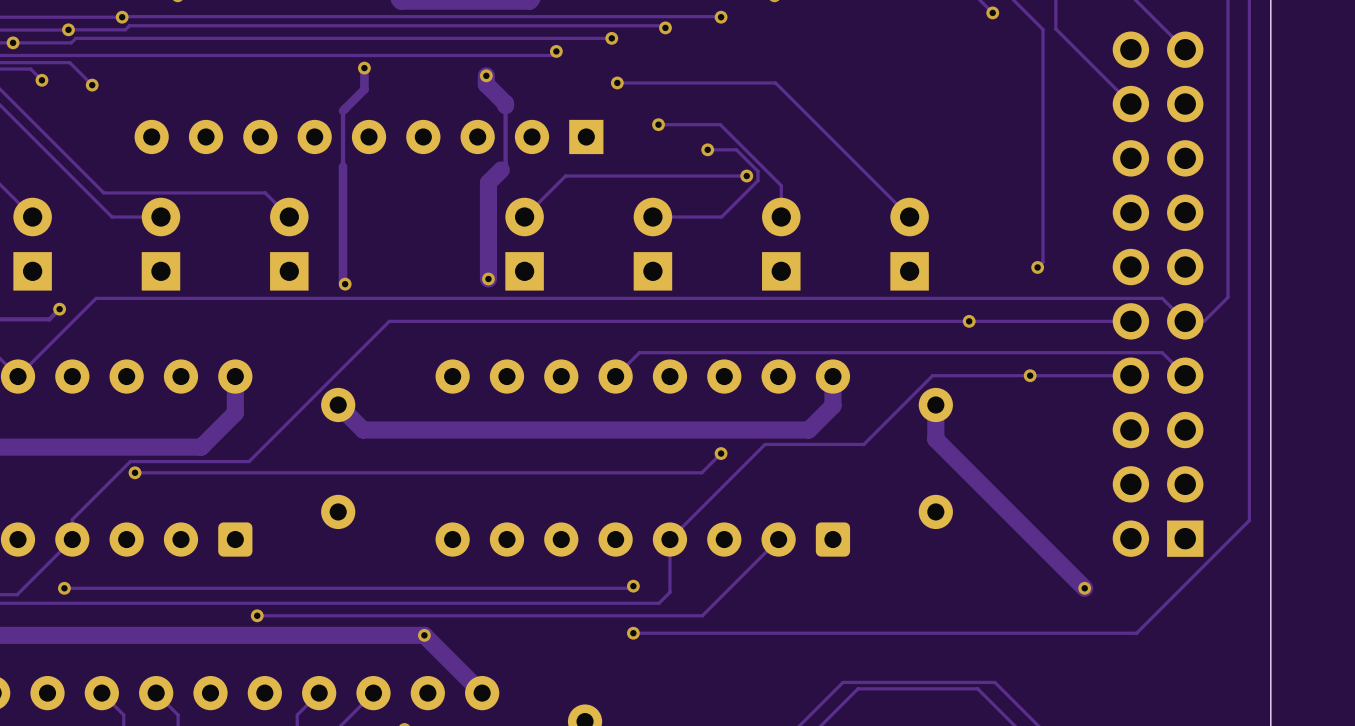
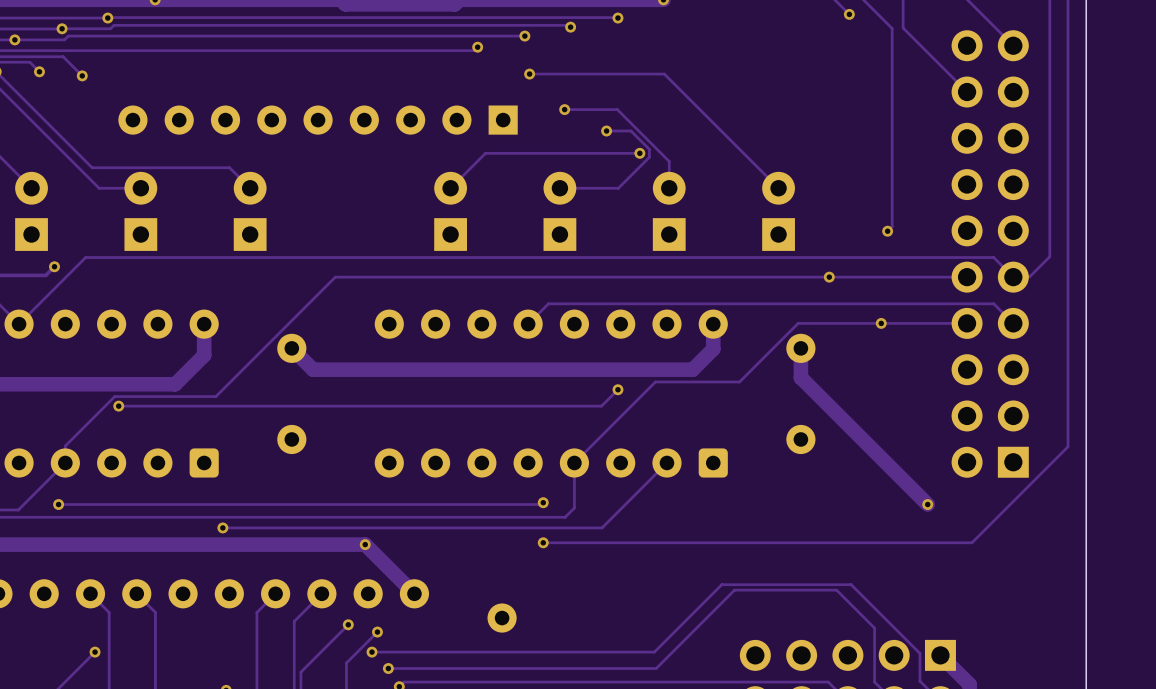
track: (364, 68) (364, 89) (343, 110) (343, 282) (345, 284) -> none
via: (364, 68) -> none
track: (486, 75) (486, 84) (505, 103) (505, 163) (488, 182) (488, 279) -> none
via: (486, 75) -> none
via: (488, 279) -> none
via: (345, 284) -> none

